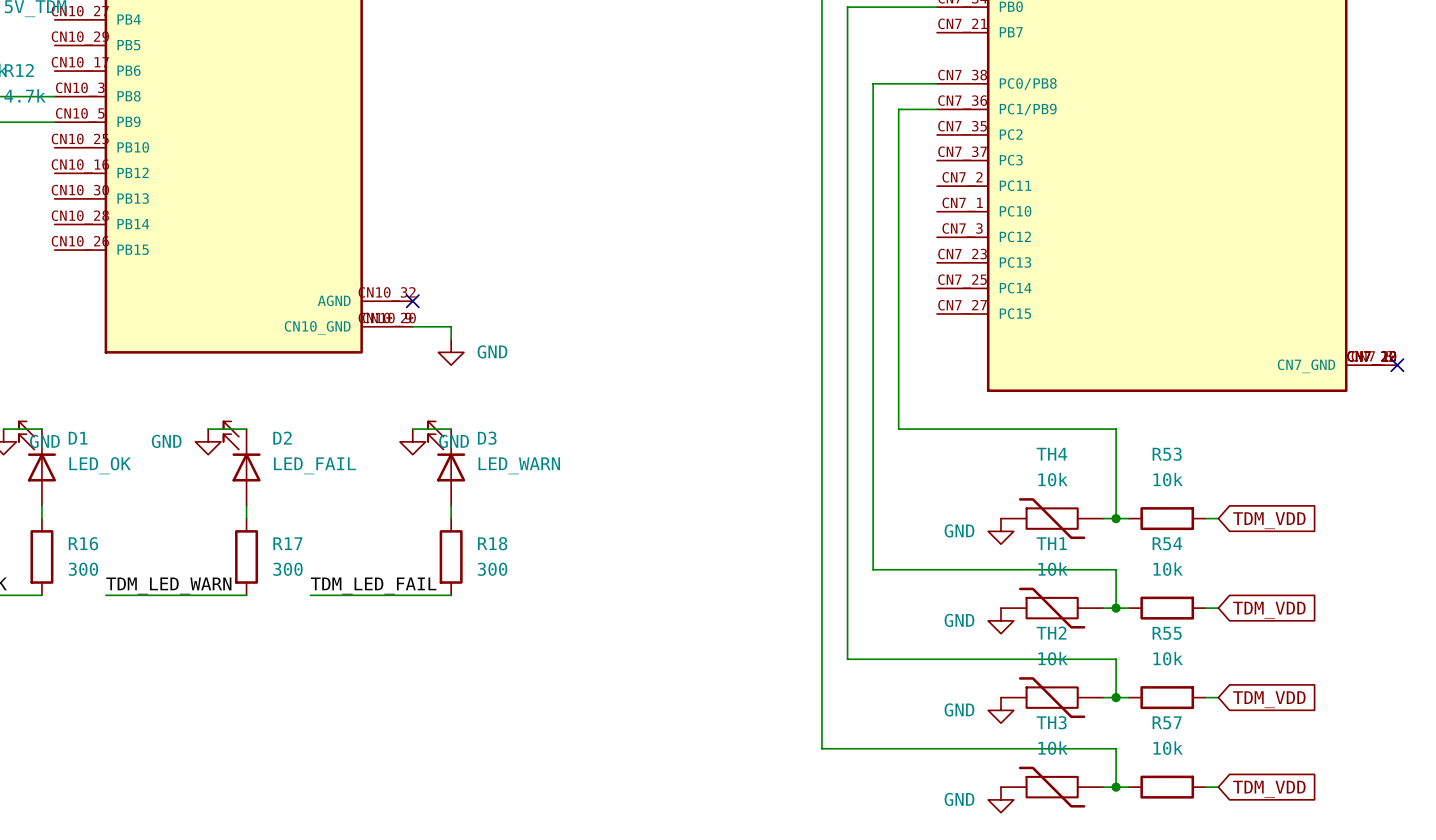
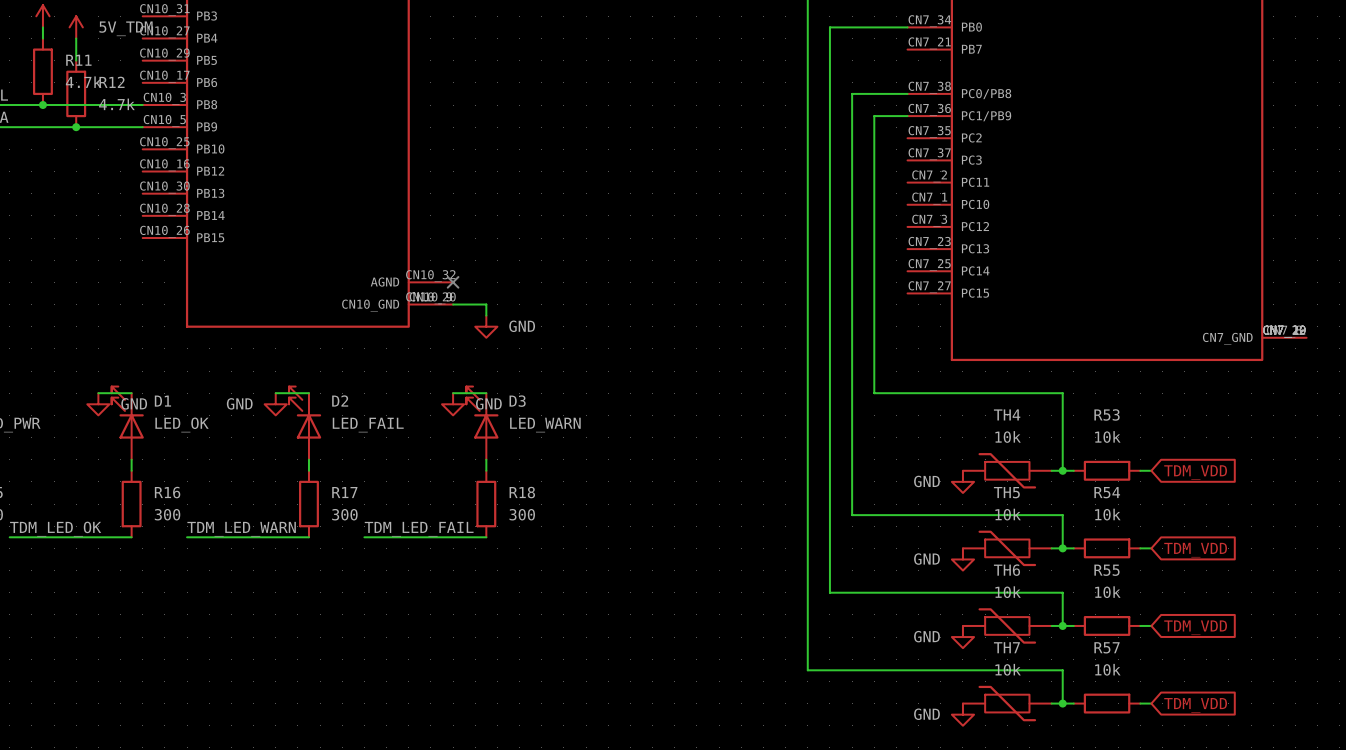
no-connect mark: (1397, 365) -> none
TH1 name: TH1 (1051, 543) -> TH5 (1006, 492)
TH2 name: TH2 (1051, 633) -> TH6 (1006, 570)
TH3 name: TH3 (1051, 722) -> TH7 (1006, 647)

